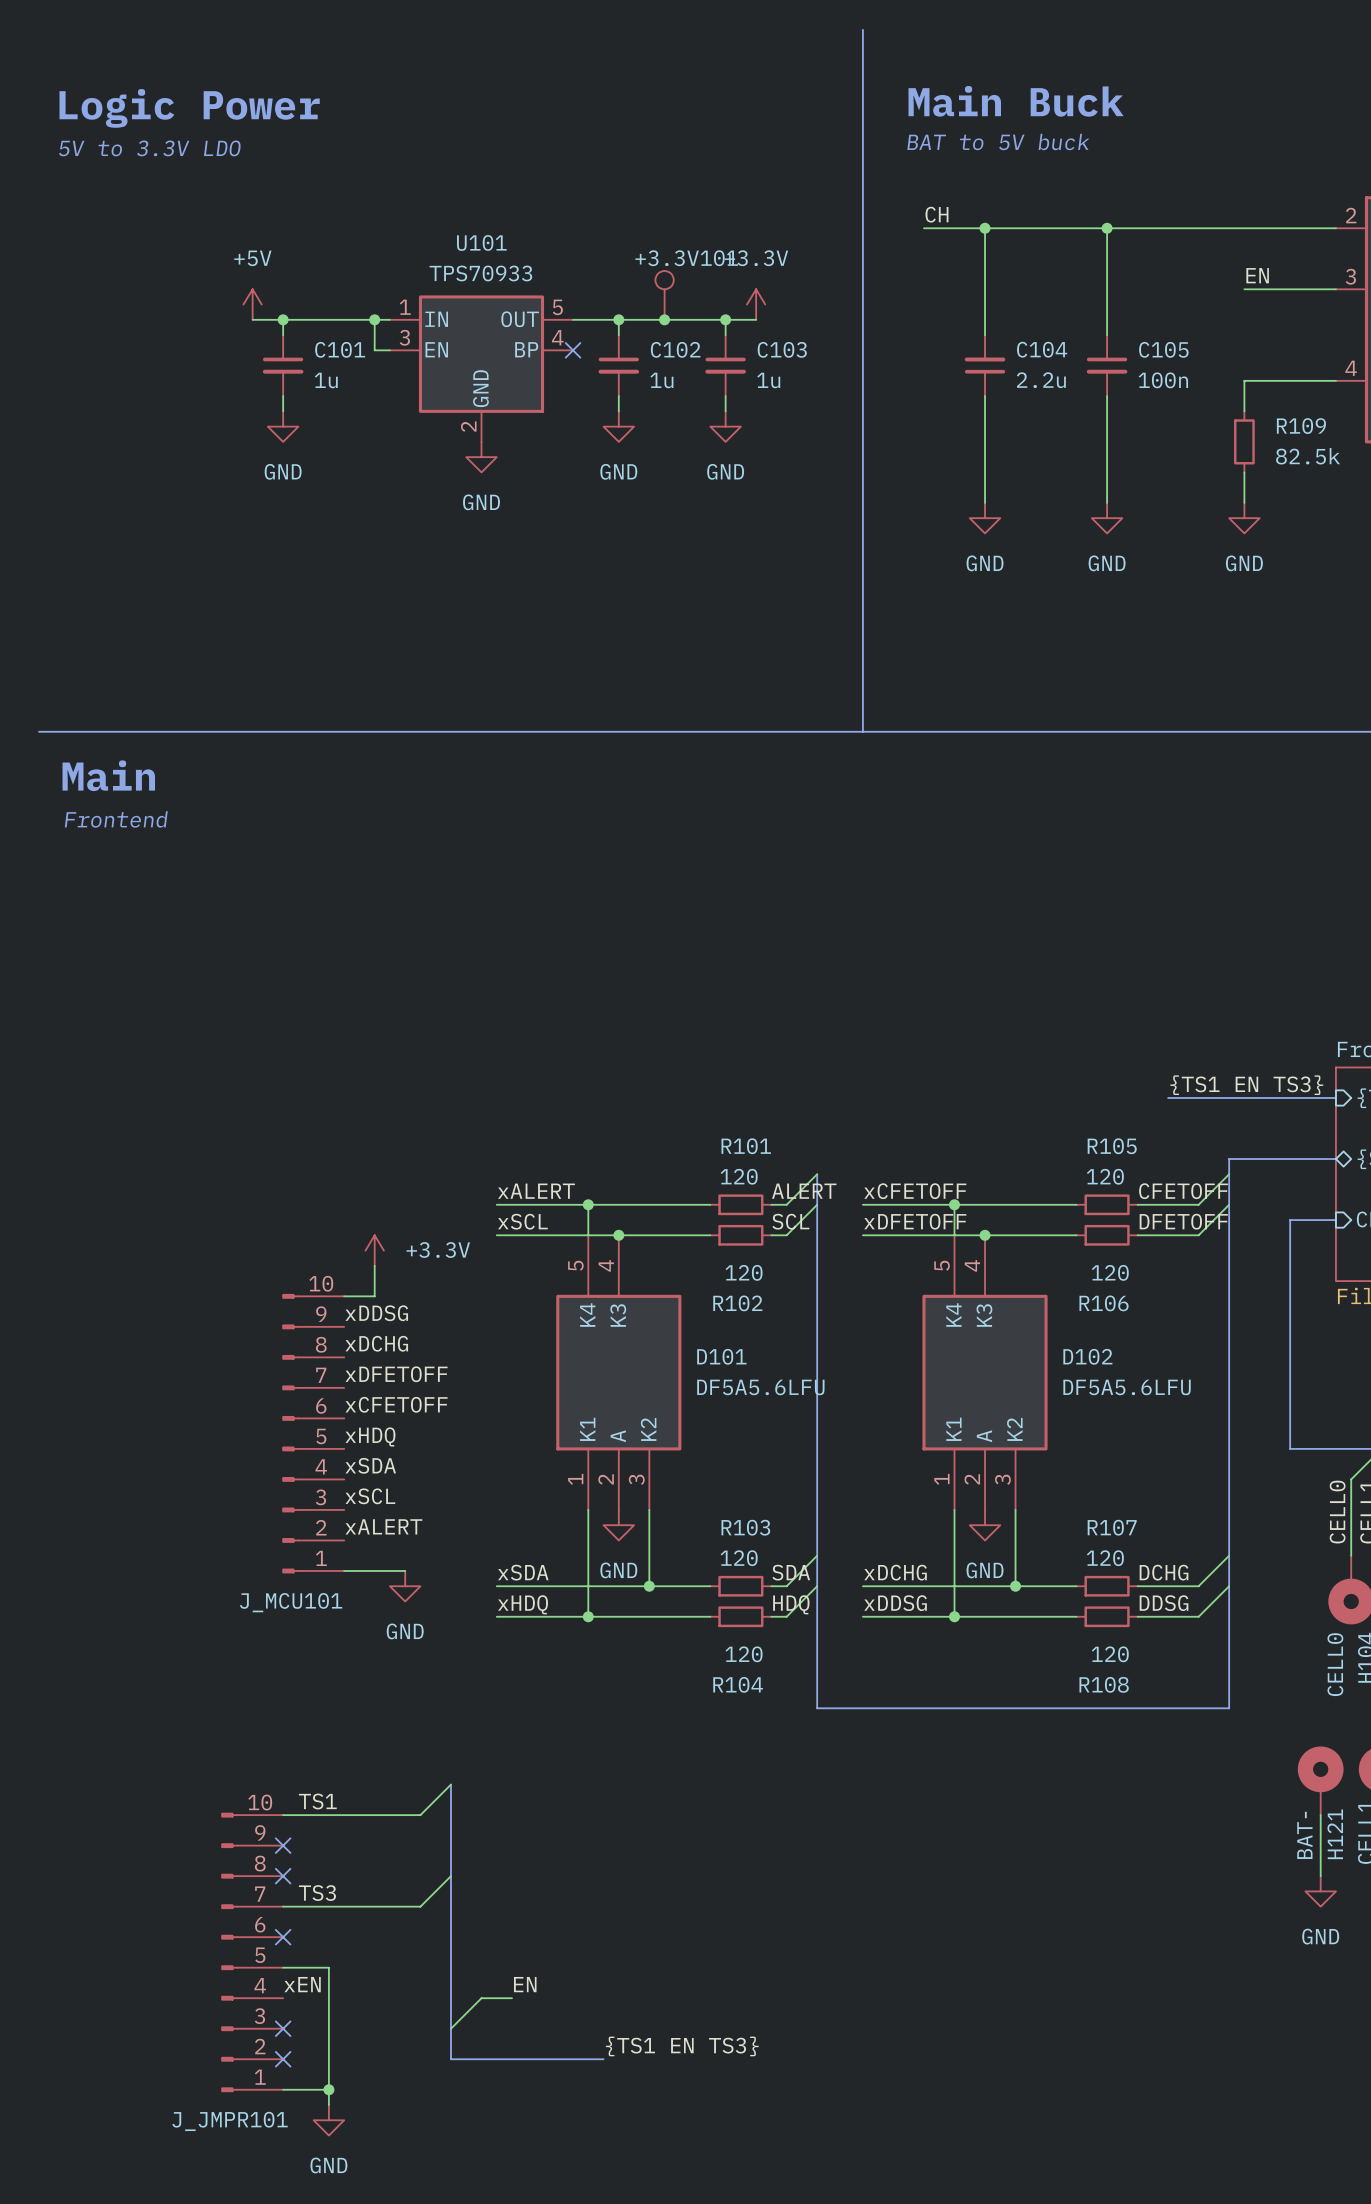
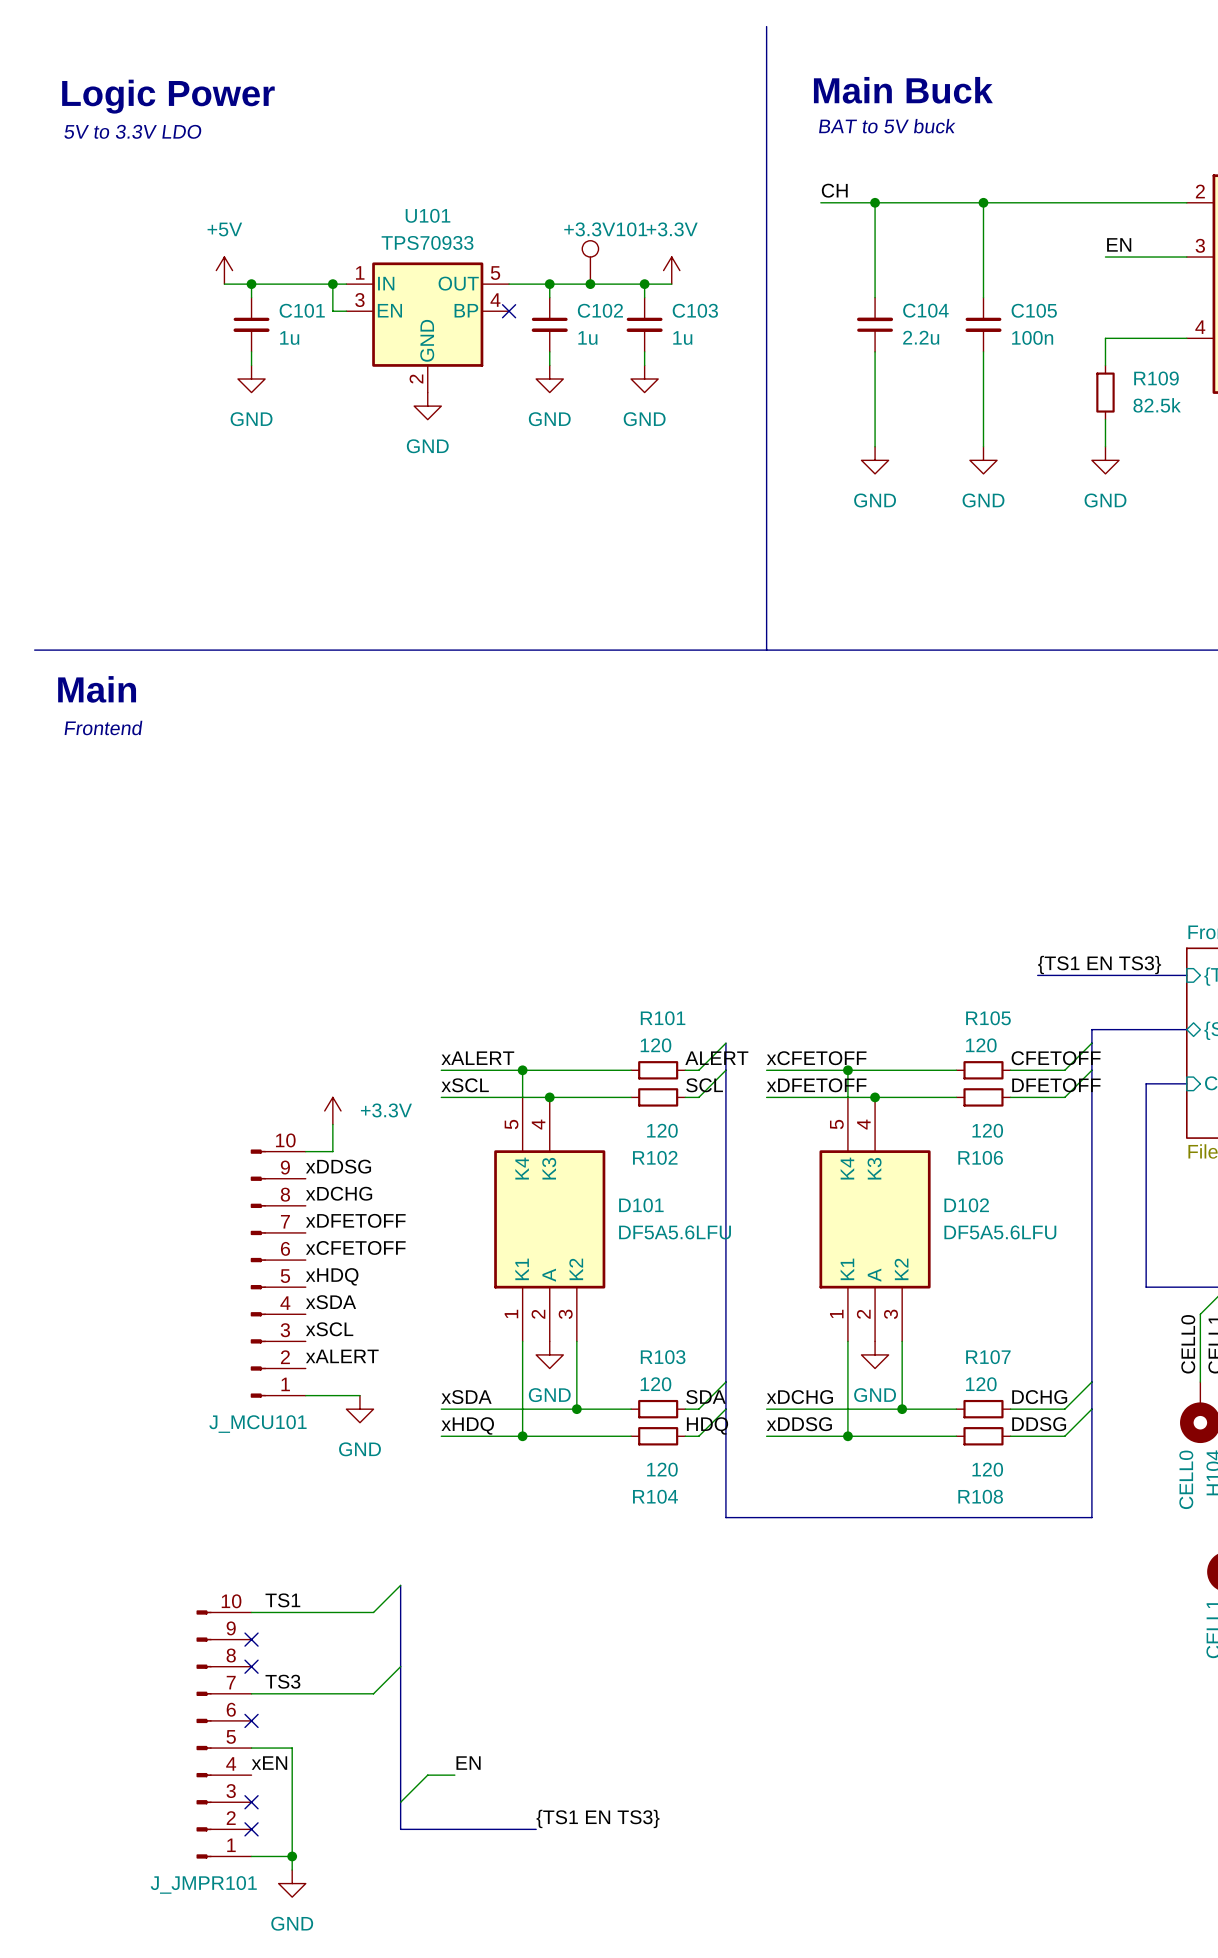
H121: BAT- (1320, 1780) -> none
wire: (1320, 1815) (1320, 1876) -> none
power symbol: GND (1320, 1891) -> none

